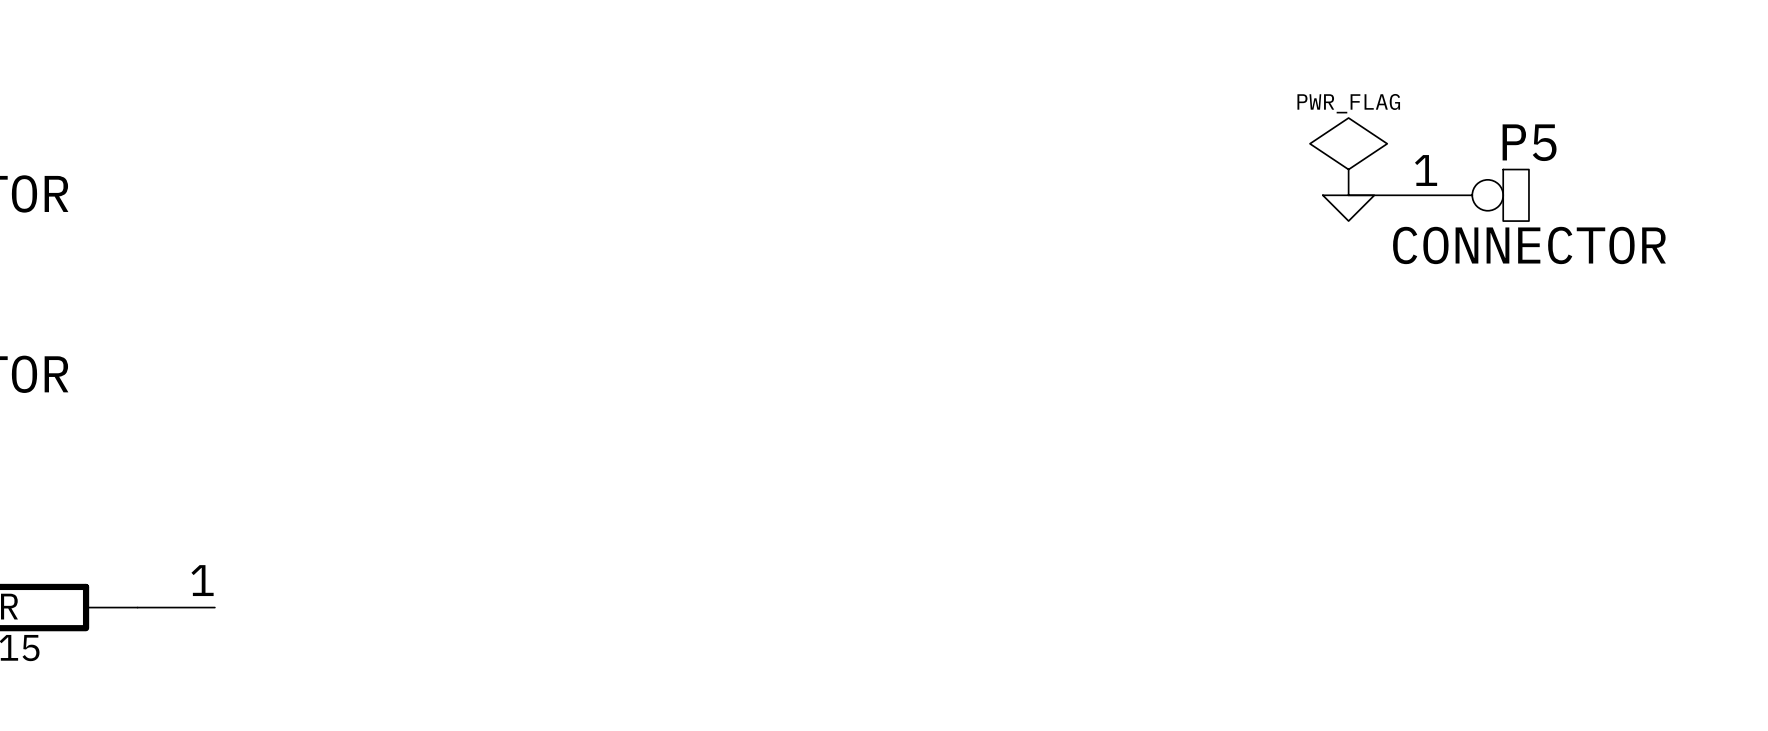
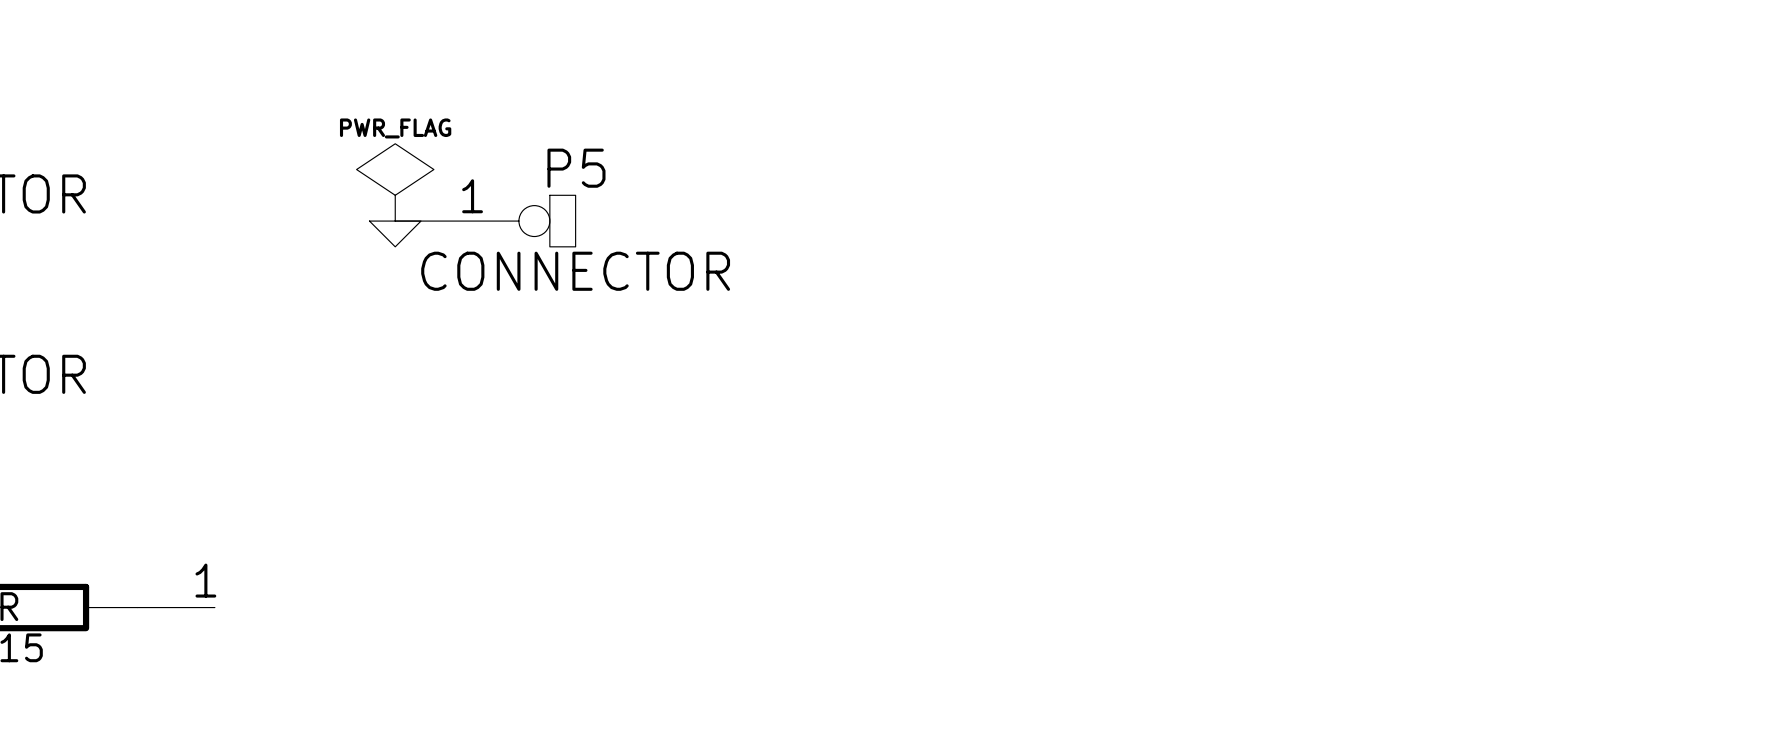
power symbol: PWR_FLAG (1348, 156) -> none
power symbol: none -> PWR_FLAG (395, 182)
P5 position: (1438, 195) -> (485, 221)
power symbol: (1348, 208) -> none
power symbol: none -> (395, 233)

